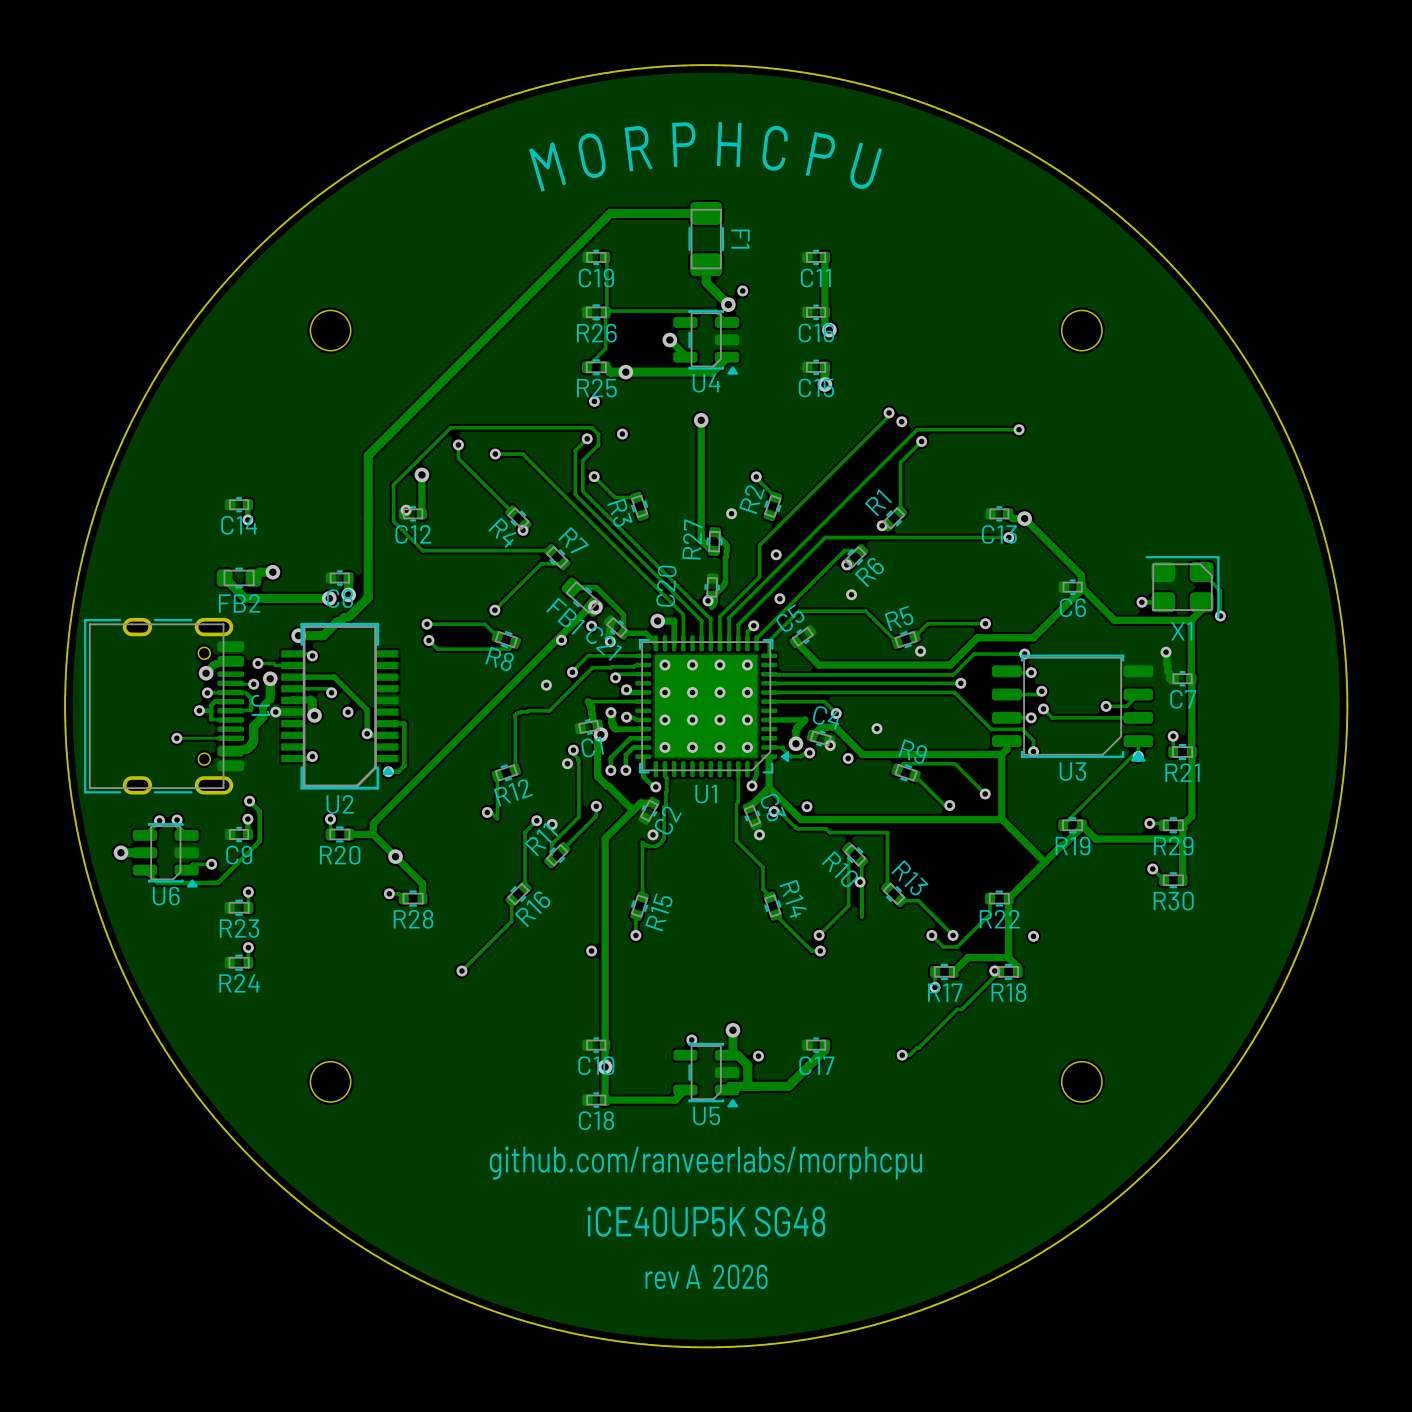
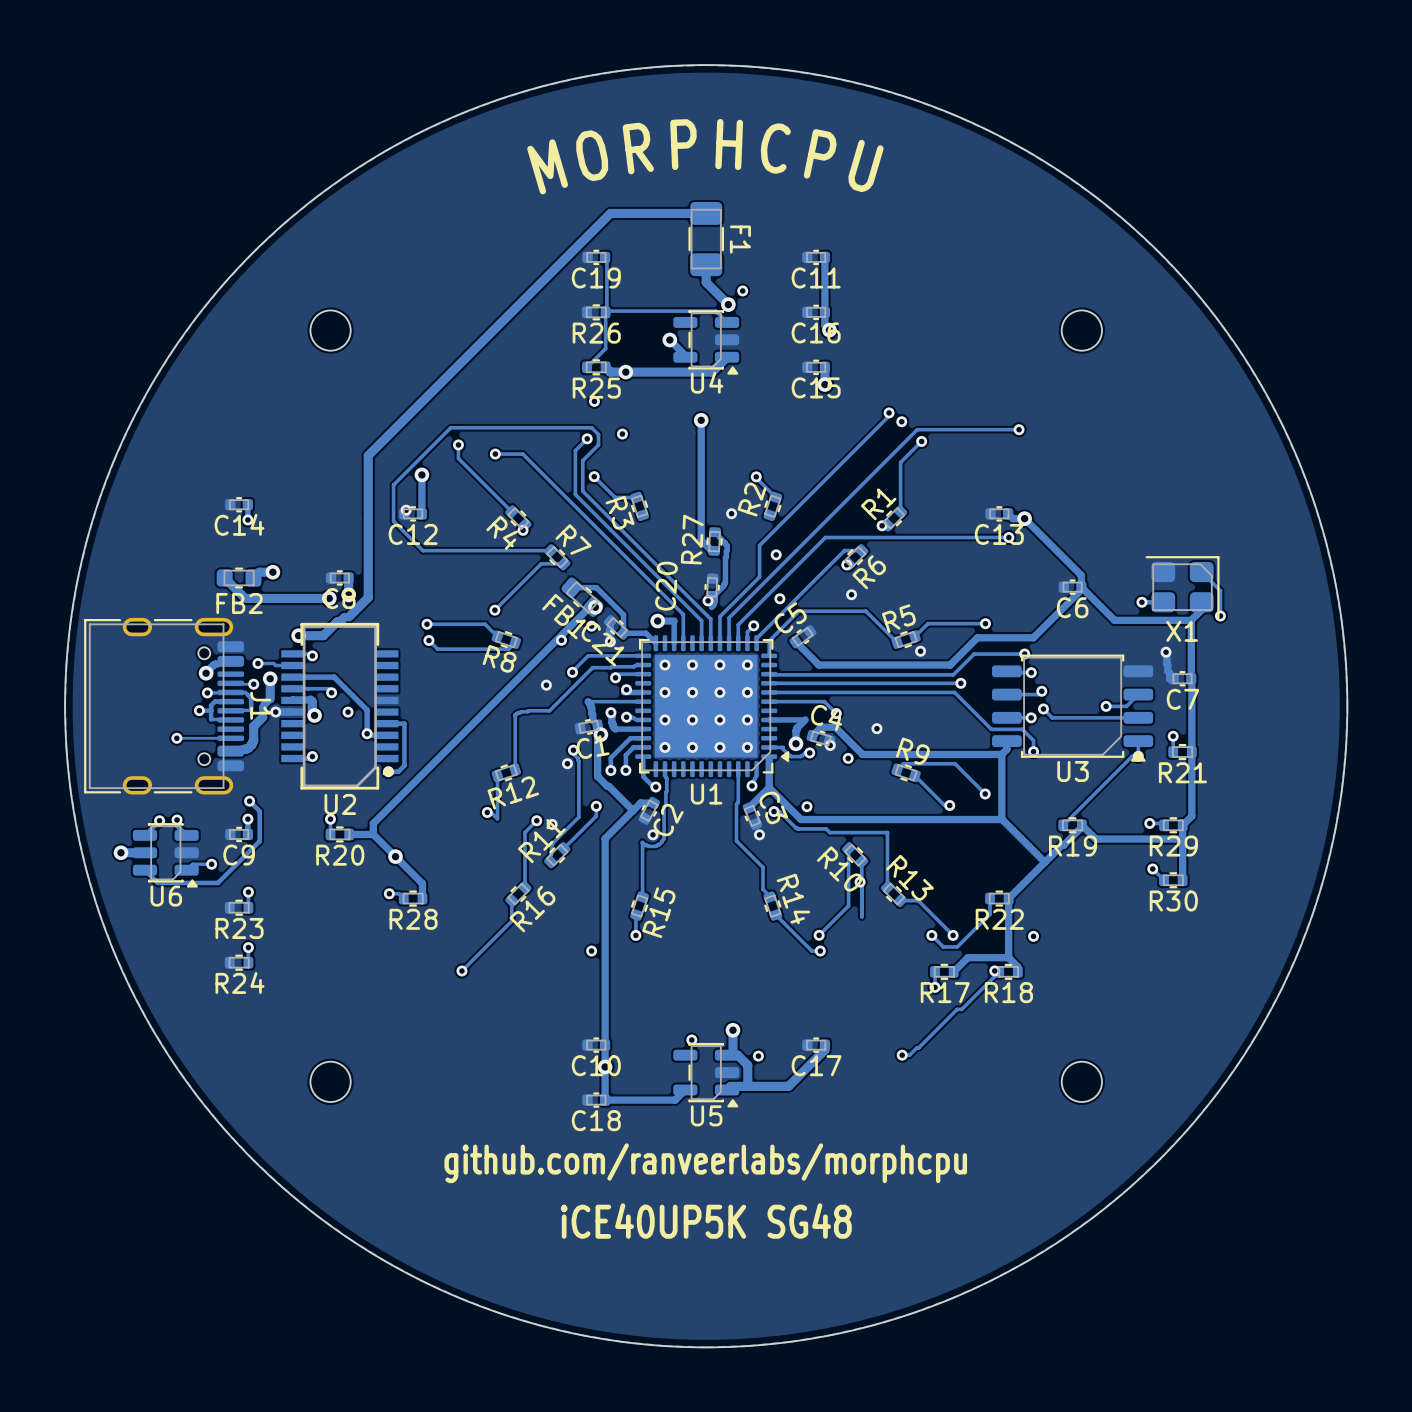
text: rev A 2026 (706, 1276) -> none

